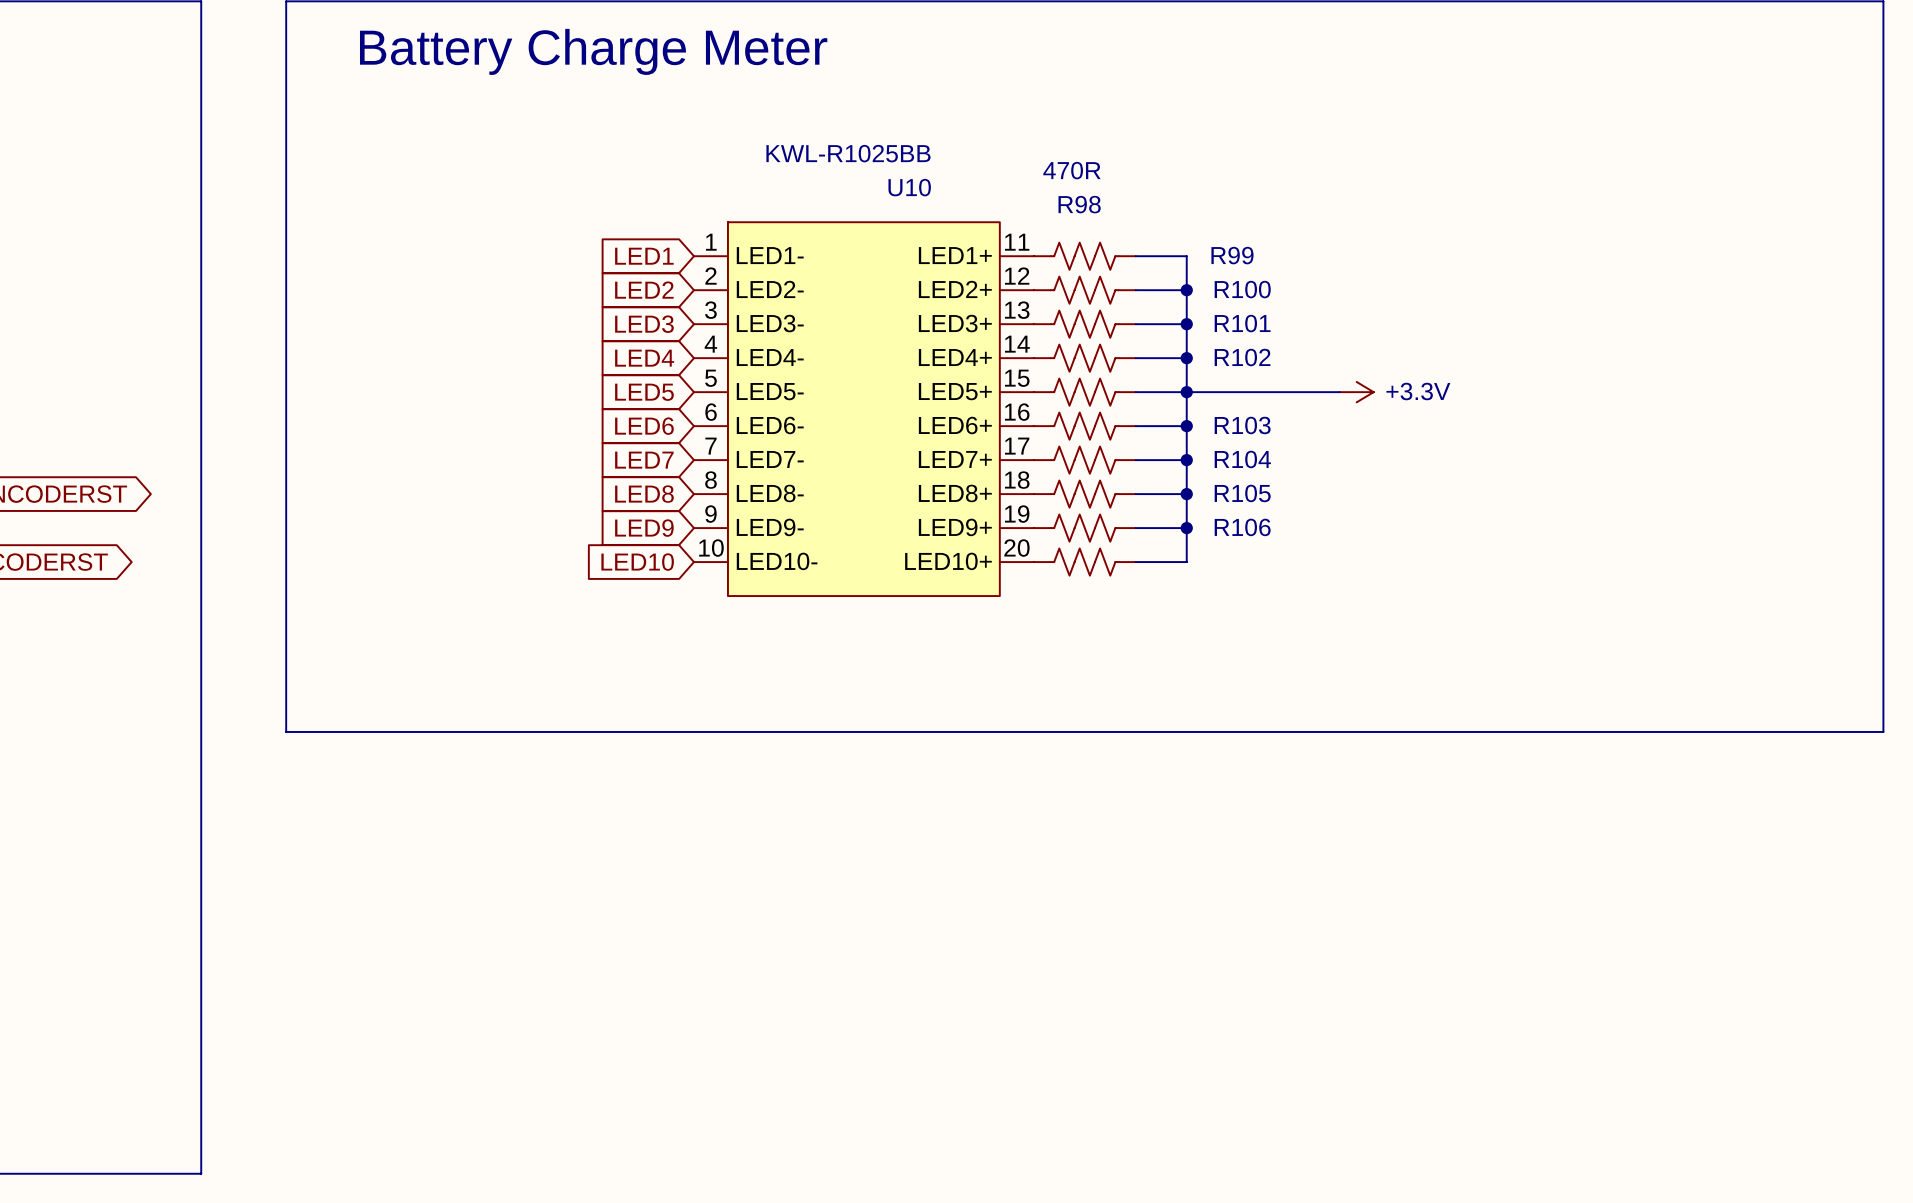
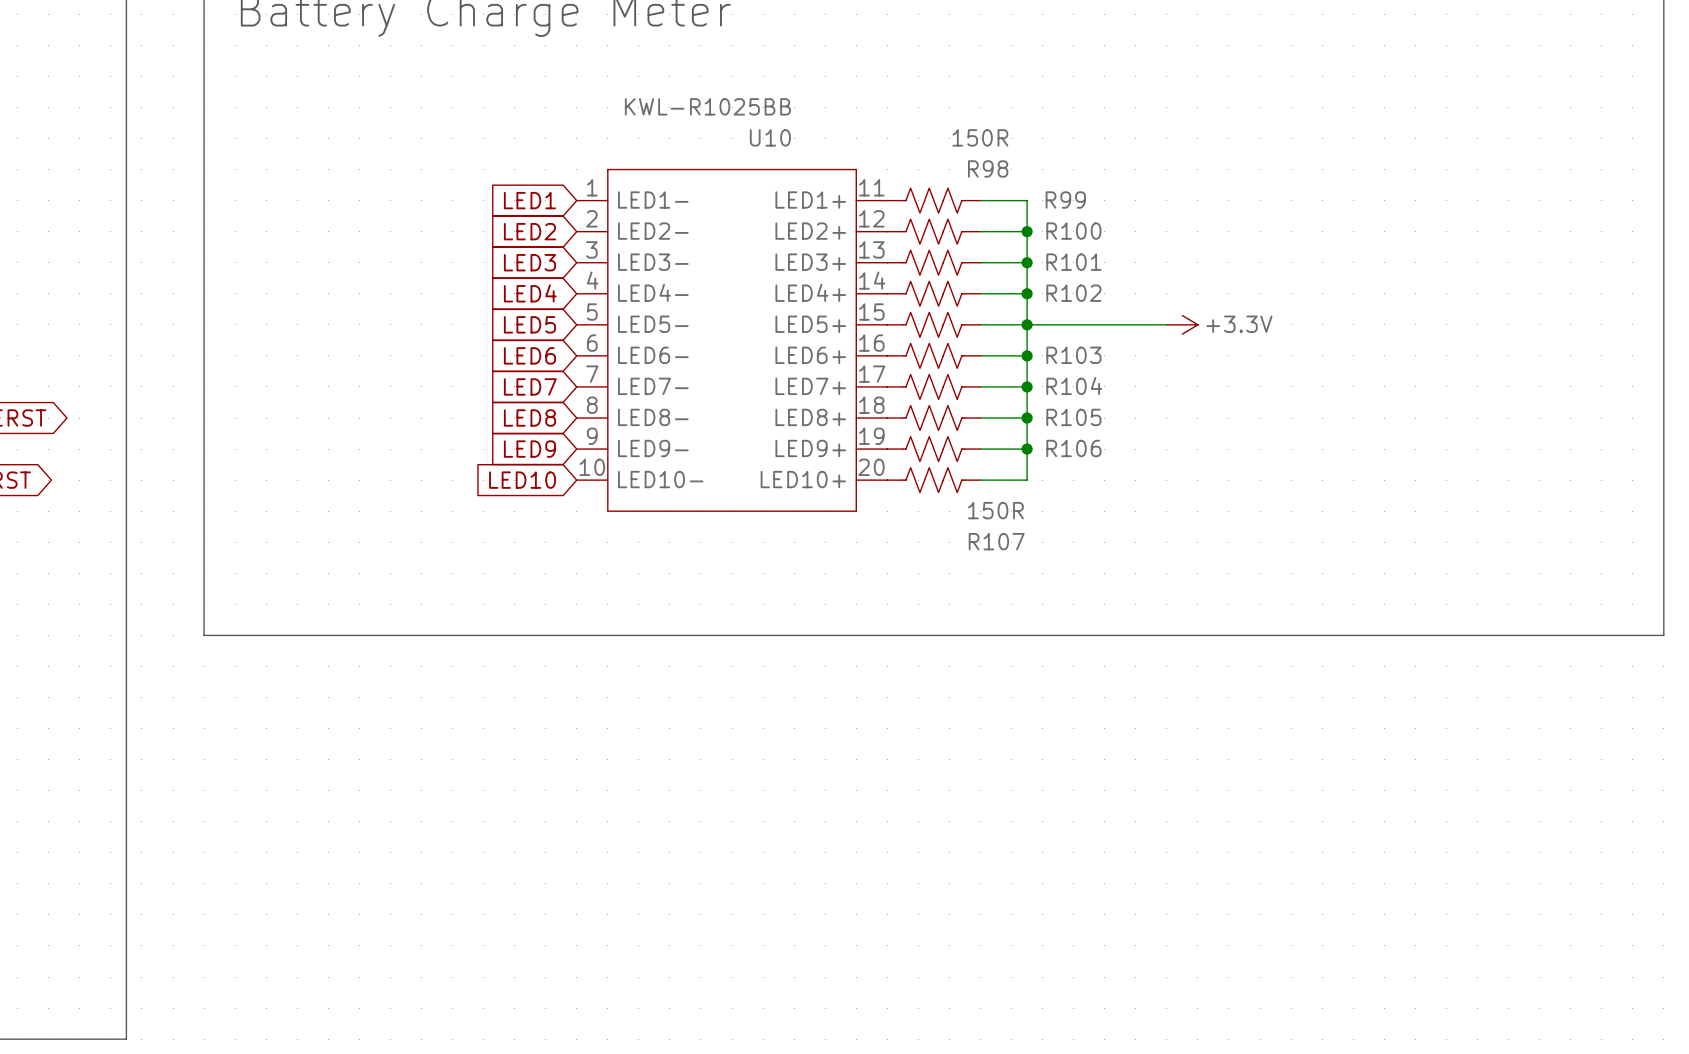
R98 value: 470R (1071, 170) -> 150R (980, 137)
R98 name position: R98 (1079, 204) -> R98 (988, 168)
R107 value: none -> 150R (995, 510)
R107 name: none -> R107 (996, 541)

